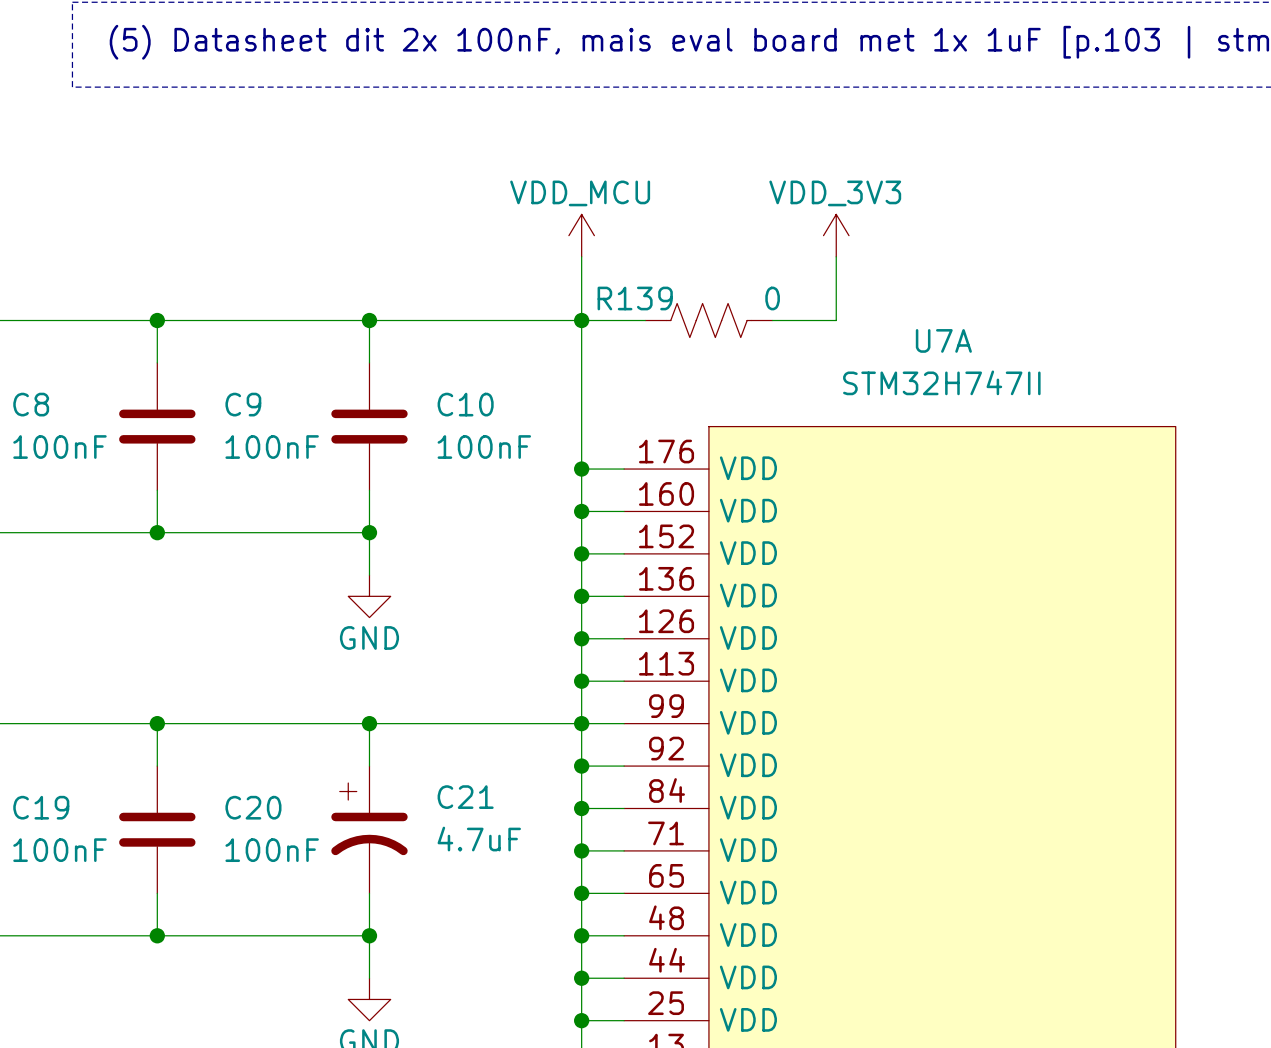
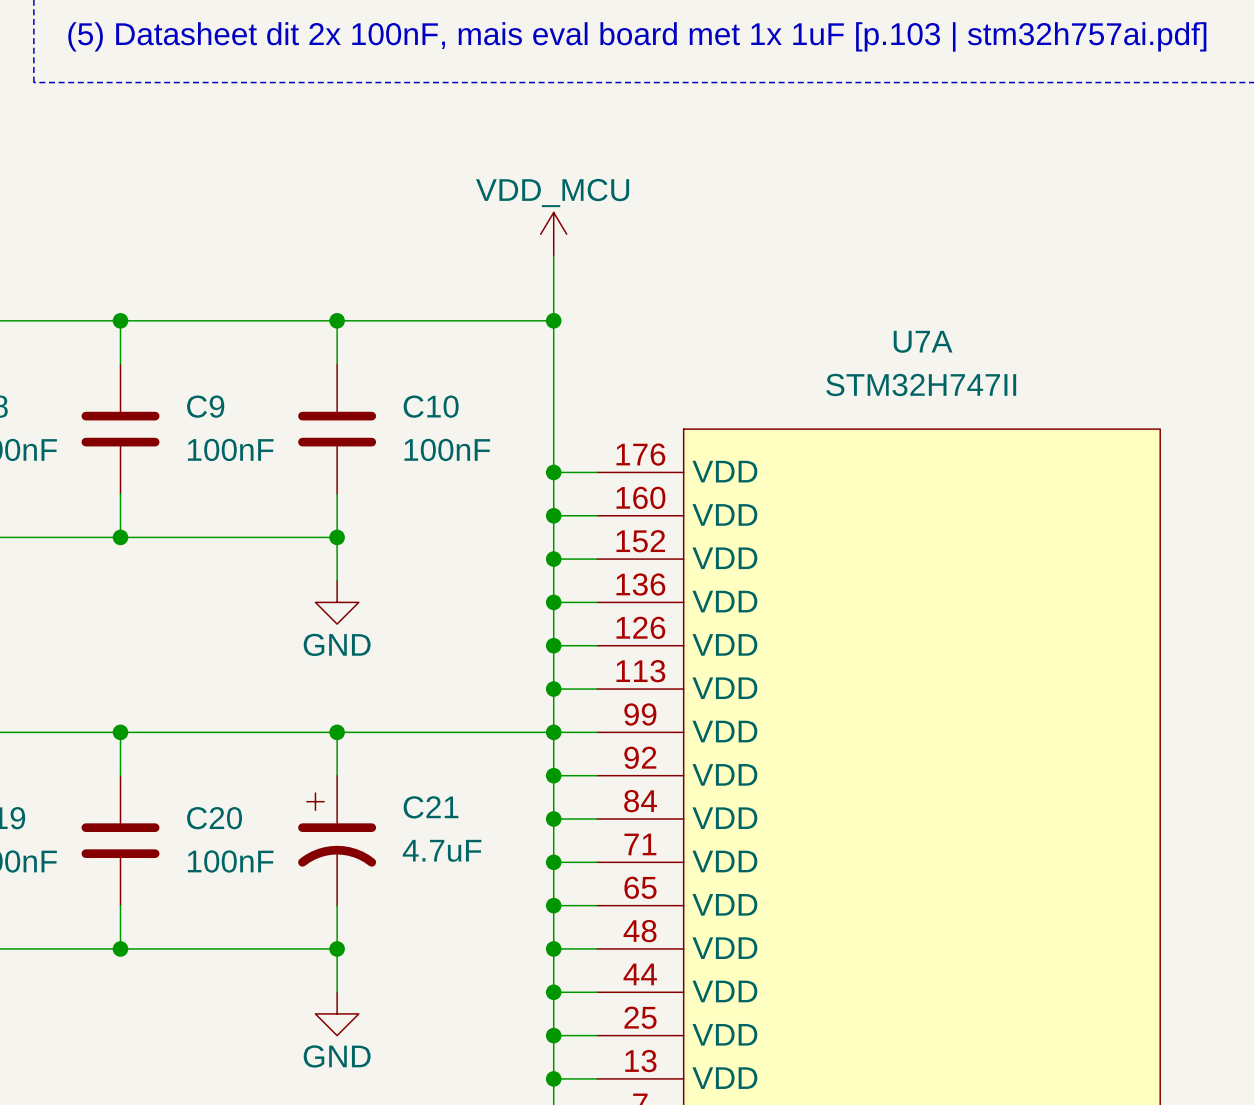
power symbol: VDD_3V3 (836, 235) -> none
wire: (836, 256) (836, 320) (772, 320) -> none
wire: (581, 320) (645, 320) -> none
R139: 0 (708, 320) -> none

